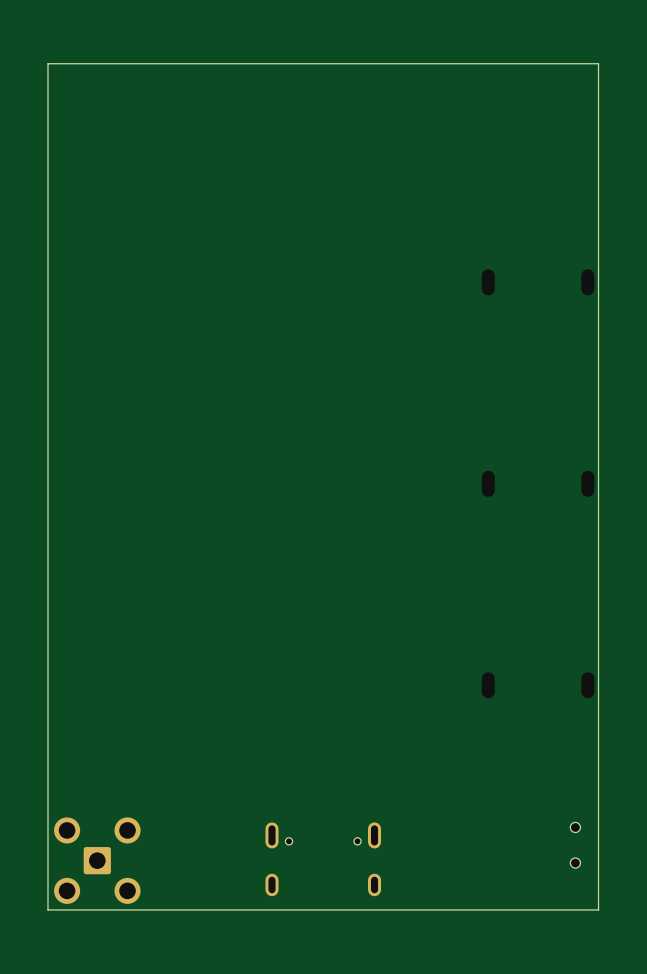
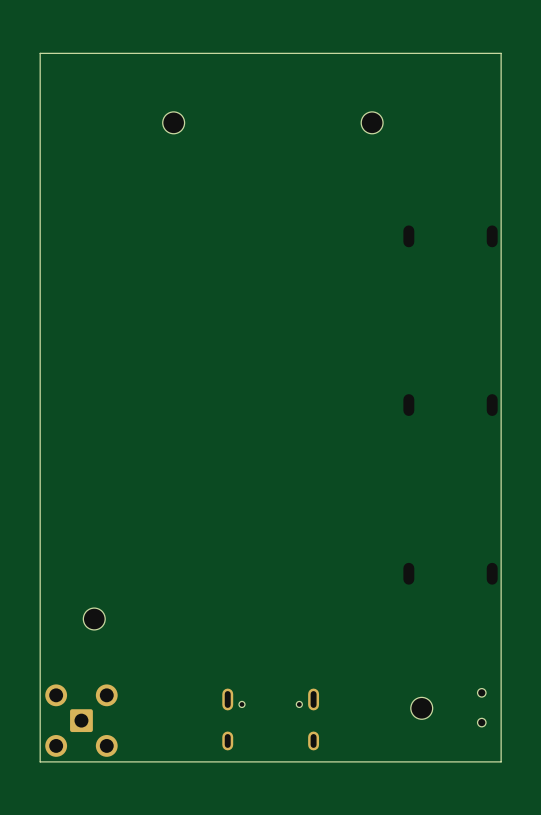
part: none -> (173, 122)
part: none -> (372, 122)
part: none -> (94, 619)
part: none -> (421, 708)

